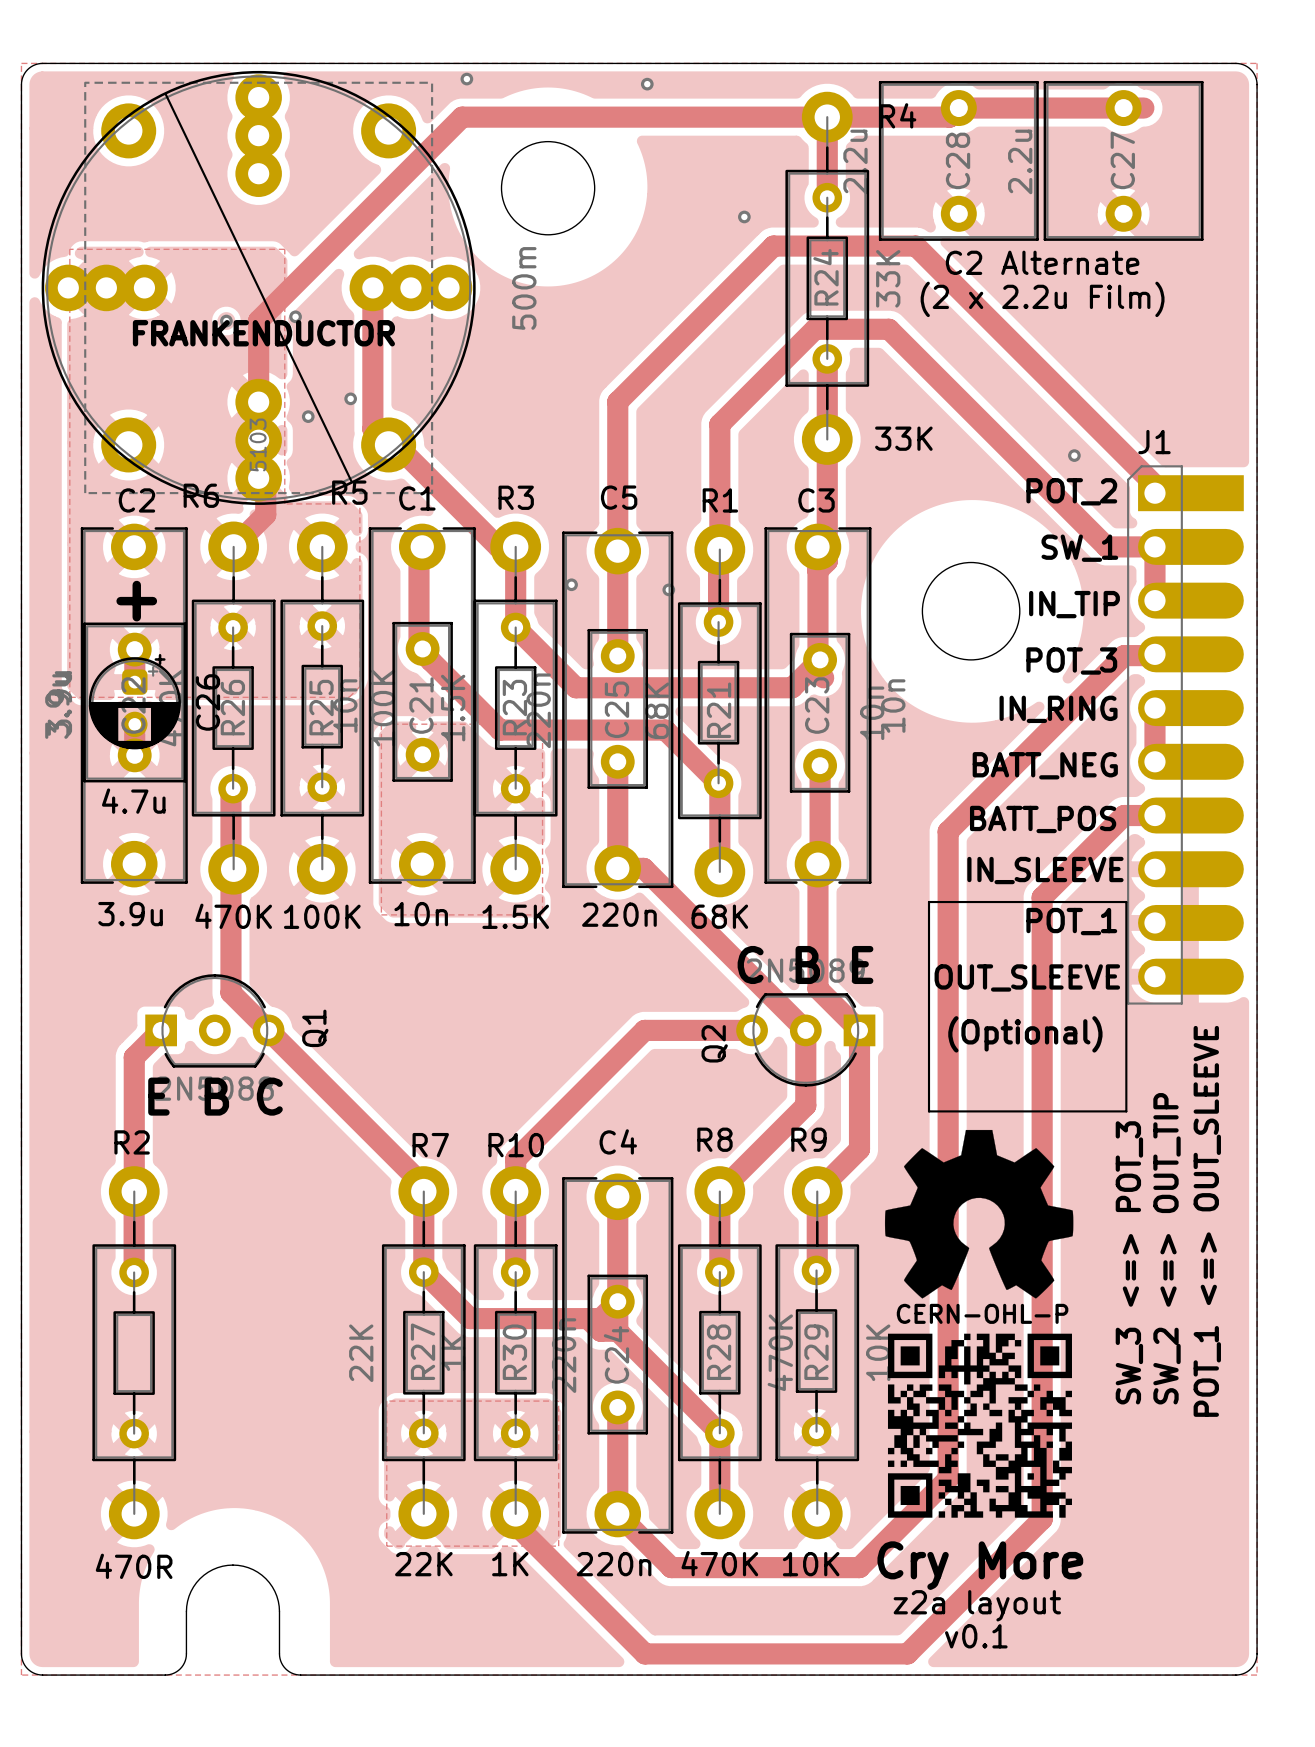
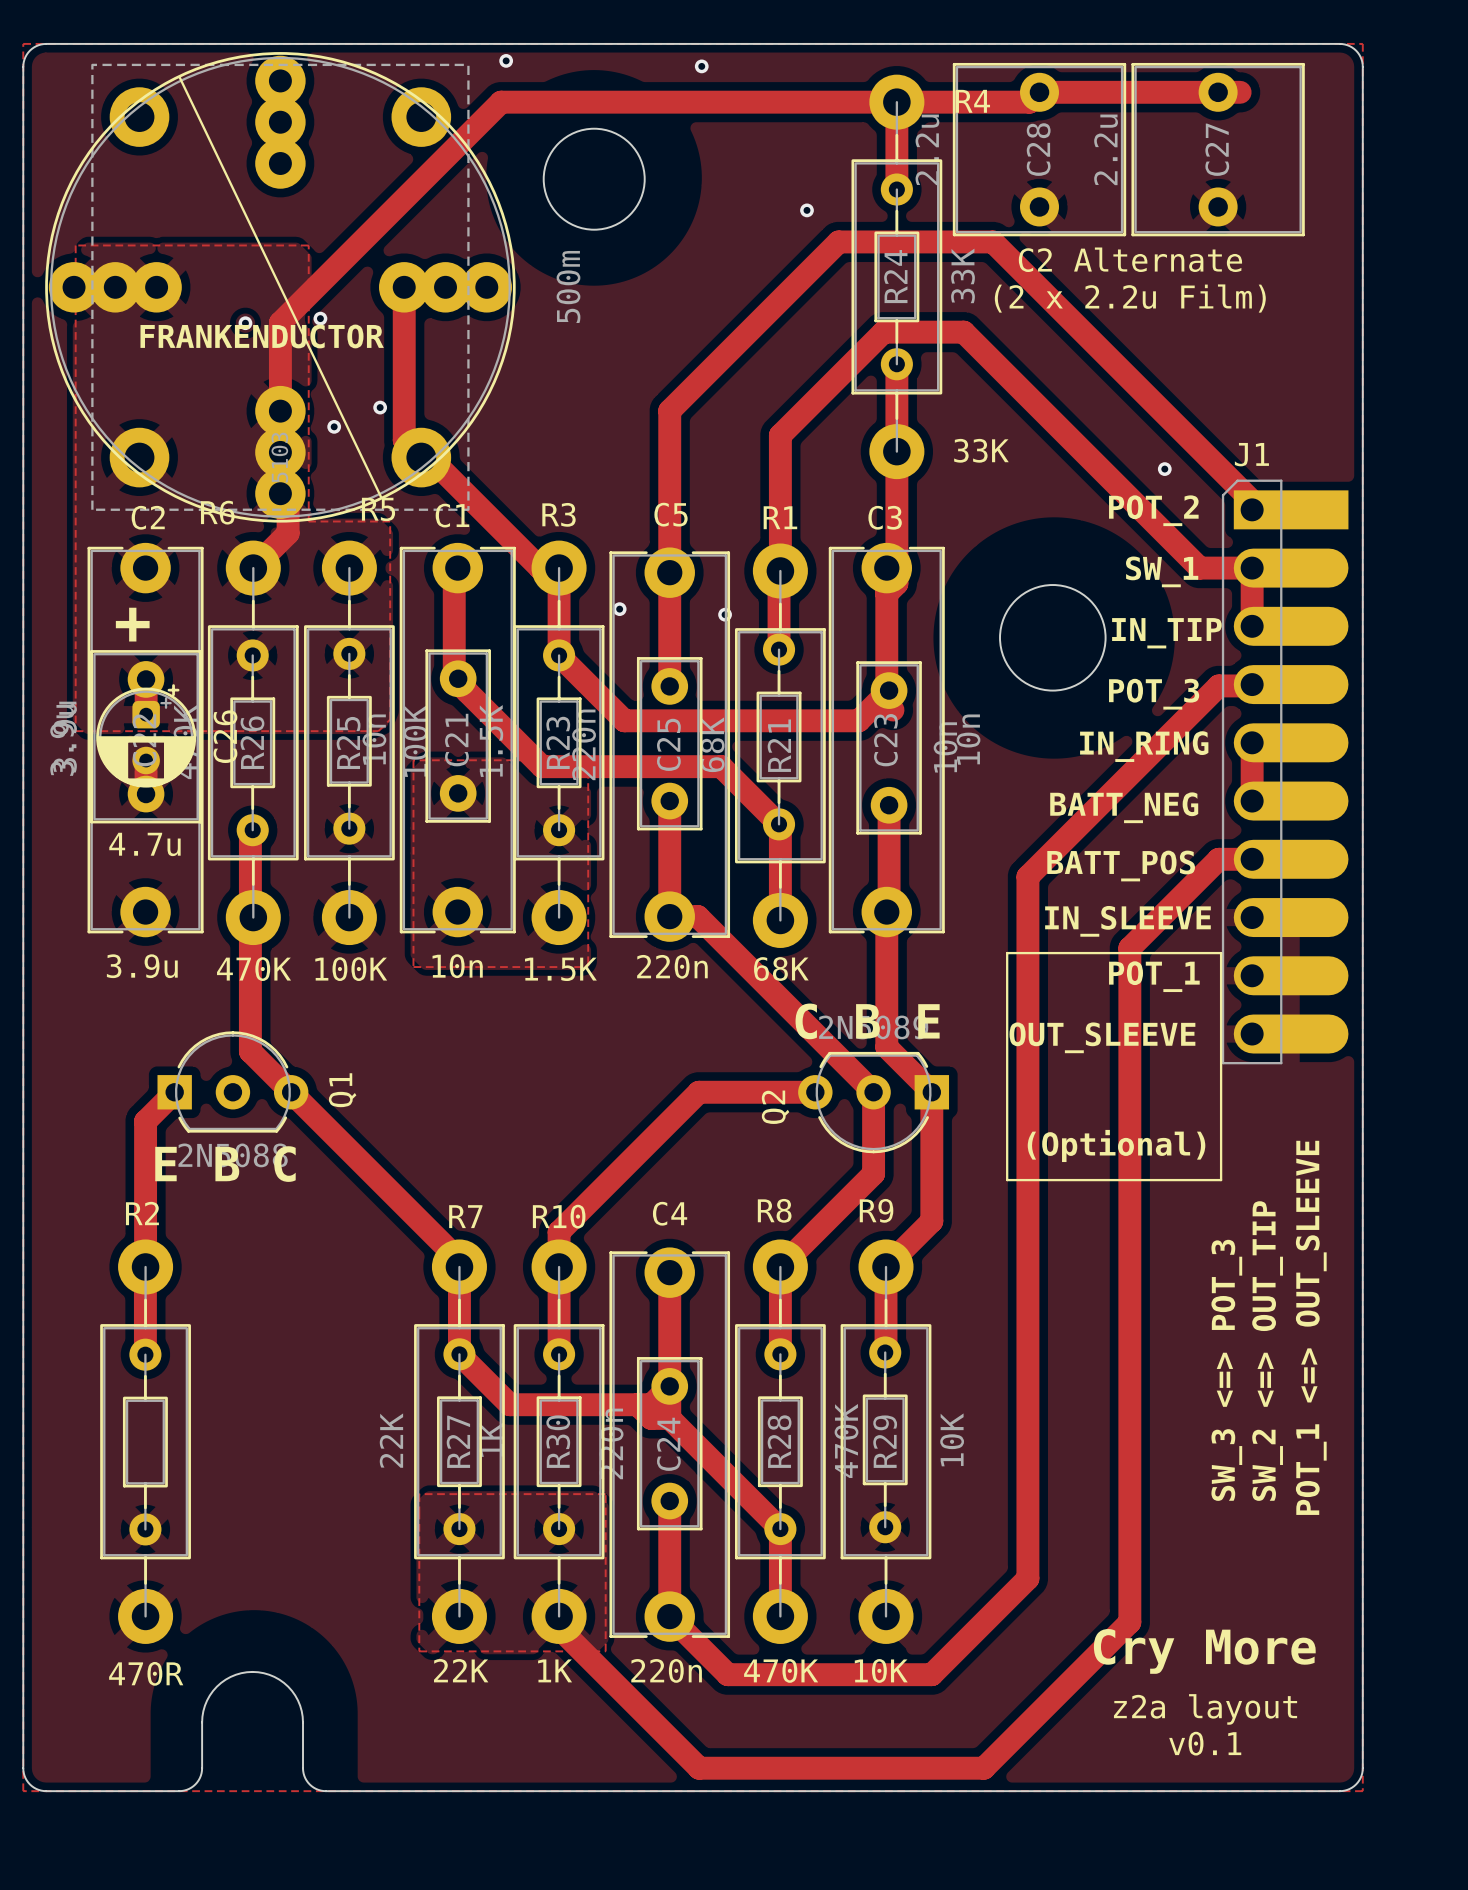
text position: (Optional) (1025, 1034) -> (Optional) (1116, 1145)
drawing: [884, 1129, 1074, 1299] -> none
text: CERN-OHL-P (982, 1313) -> none
drawing: [887, 1333, 1072, 1518] -> none
text position: Cry More (980, 1565) -> Cry More (1204, 1651)
text position: z2a layout (977, 1605) -> z2a layout (1205, 1709)
text position: v0.1 (976, 1636) -> v0.1 (1205, 1743)

